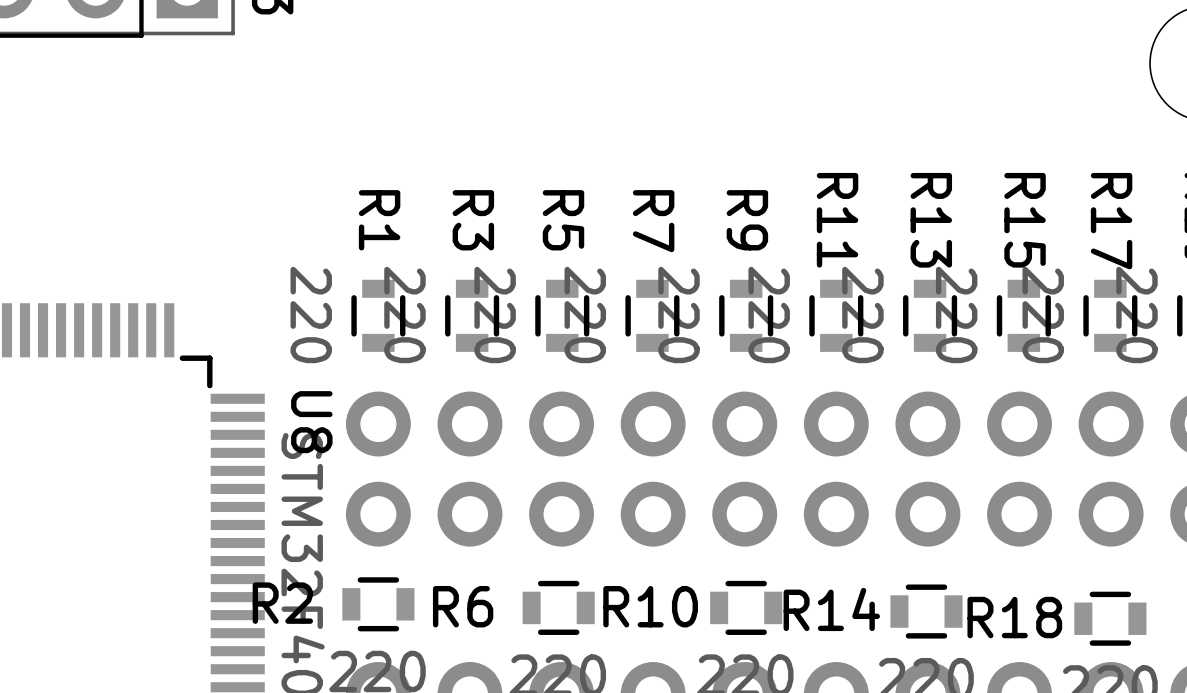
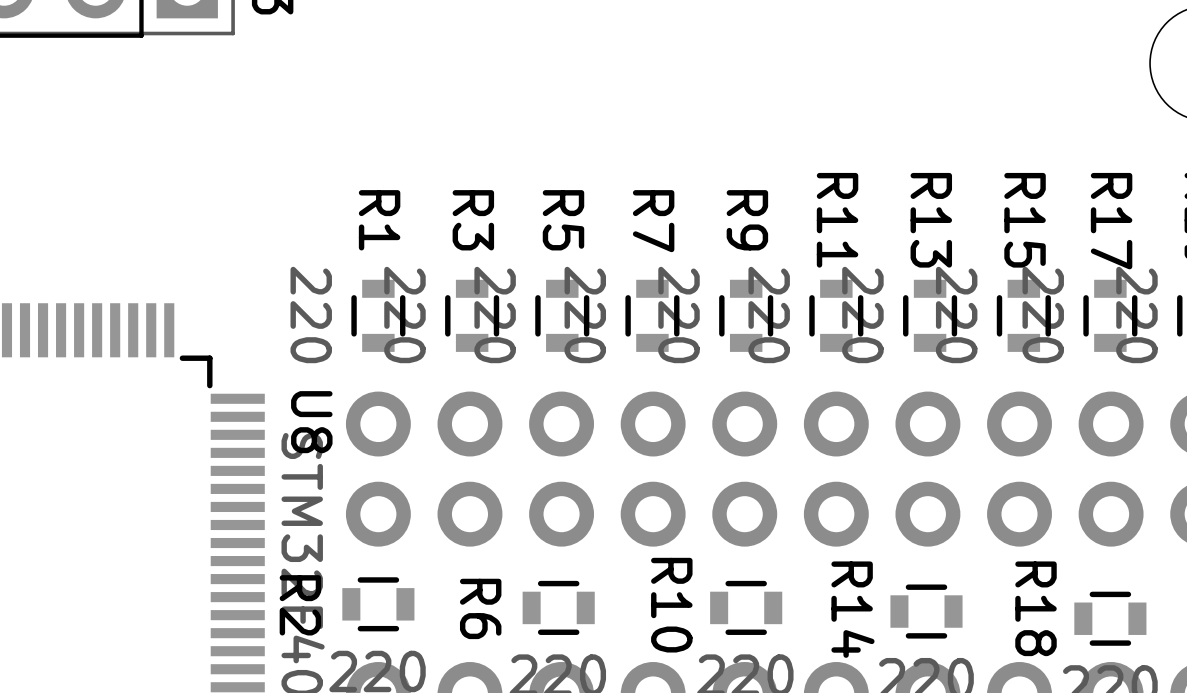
R2 name rotation: 0° (282, 603) -> 90° clockwise (300, 605)
R6 name rotation: 0° (463, 606) -> 90° clockwise (480, 608)
R10 name rotation: 0° (650, 606) -> 90° clockwise (671, 605)
R14 name rotation: 0° (831, 609) -> 90° clockwise (852, 609)
R18 name rotation: 0° (1014, 617) -> 90° clockwise (1036, 608)

